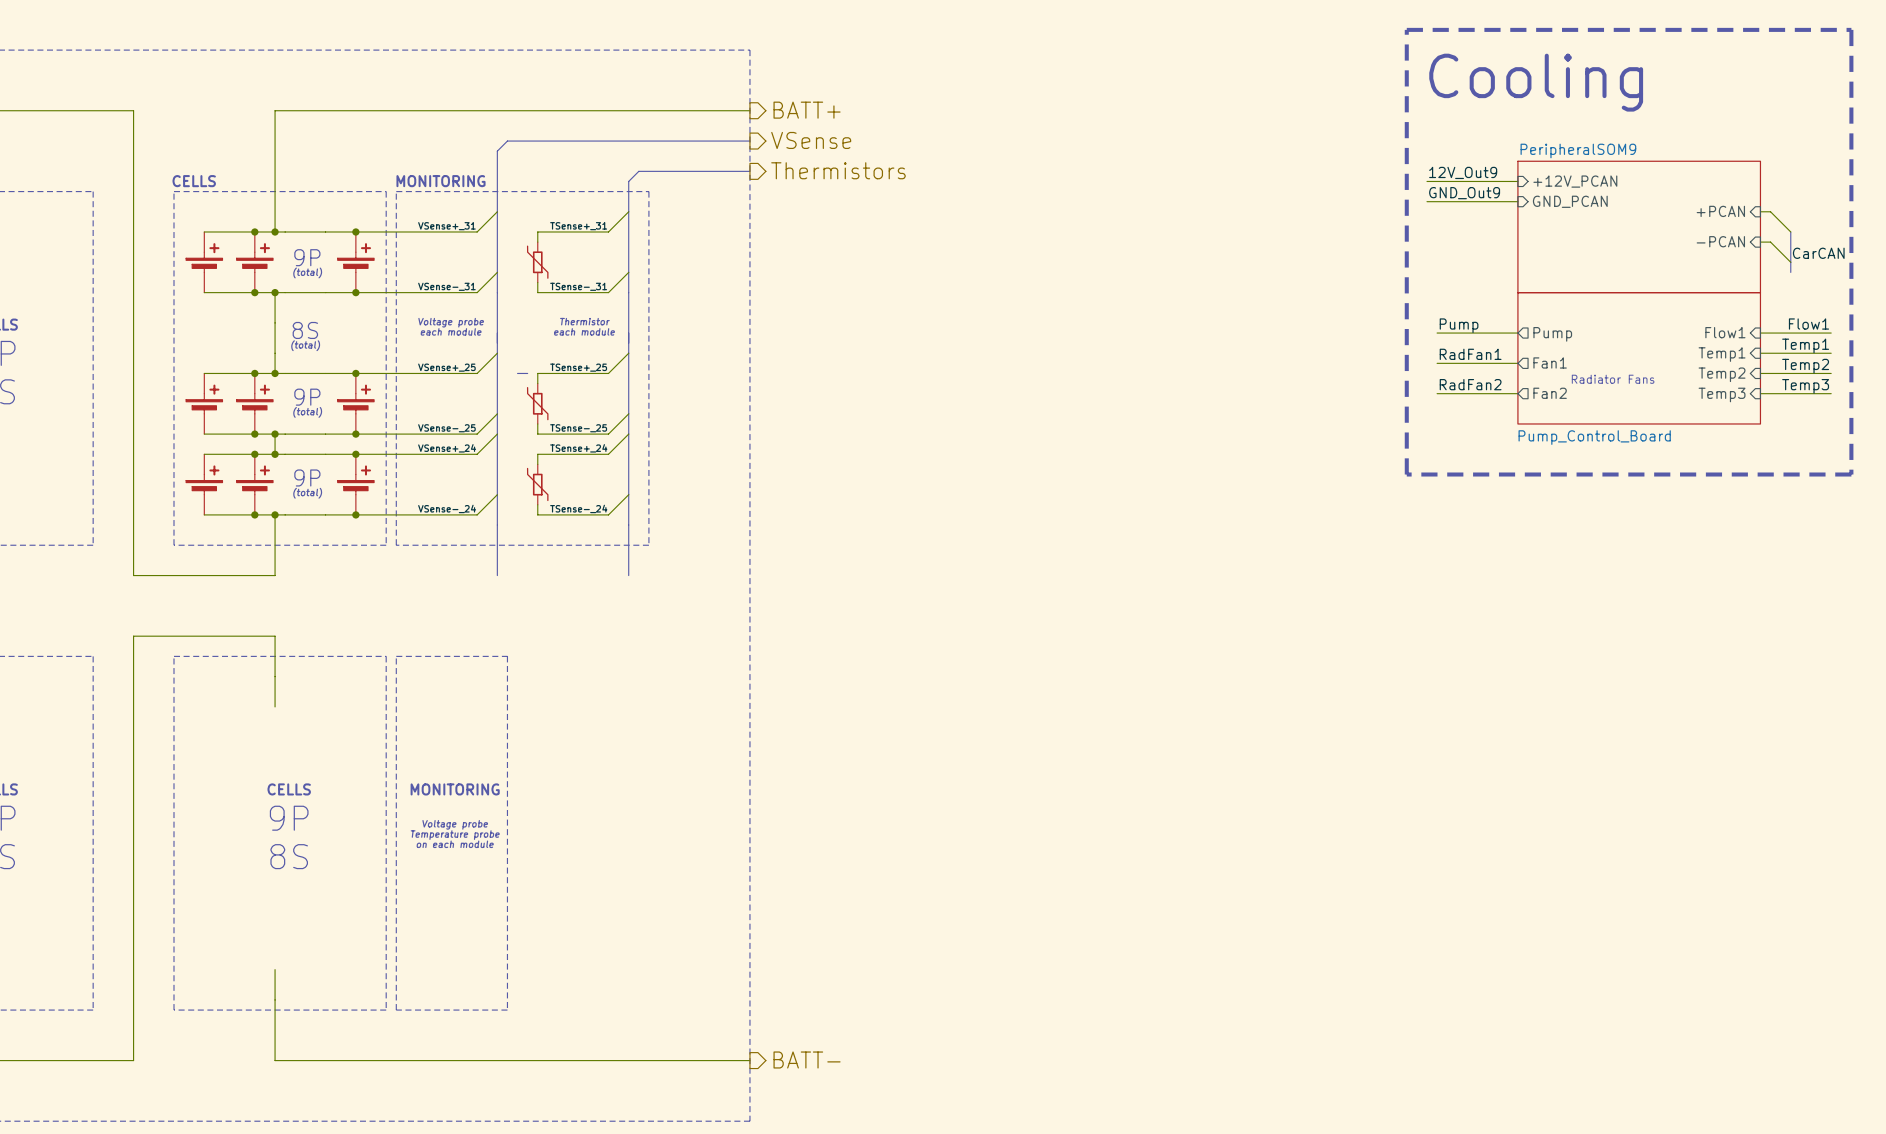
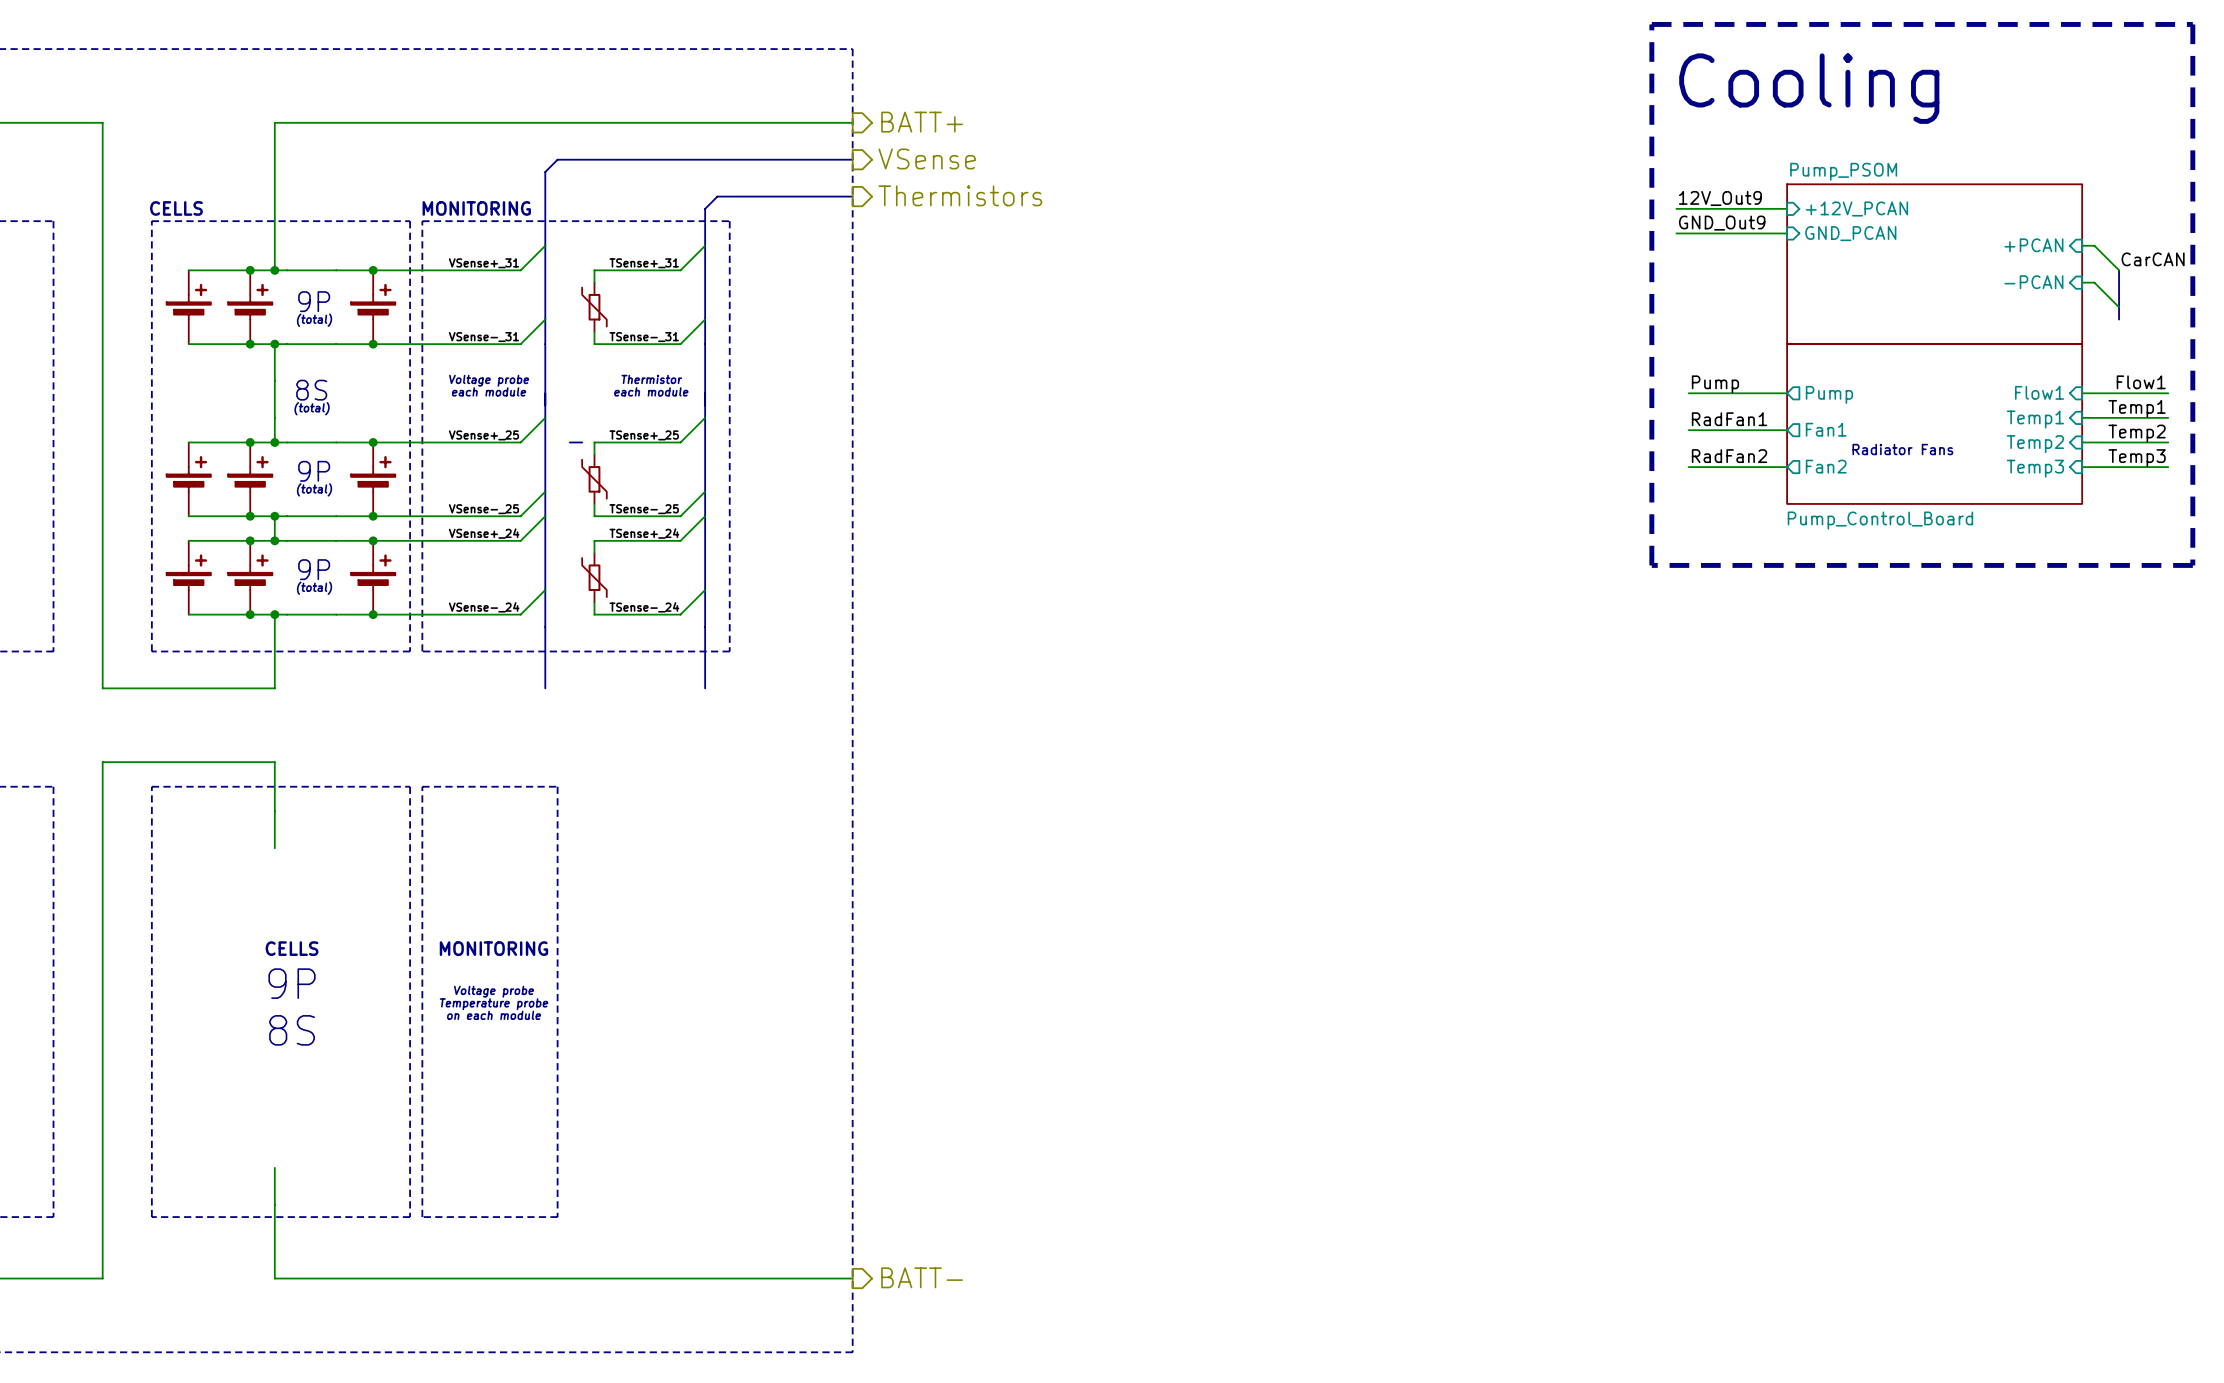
sheet PeripheralSOM9 name: PeripheralSOM9 (1578, 150) -> Pump_PSOM (1843, 171)
label position: CarCAN (1818, 253) -> CarCAN (2153, 259)

